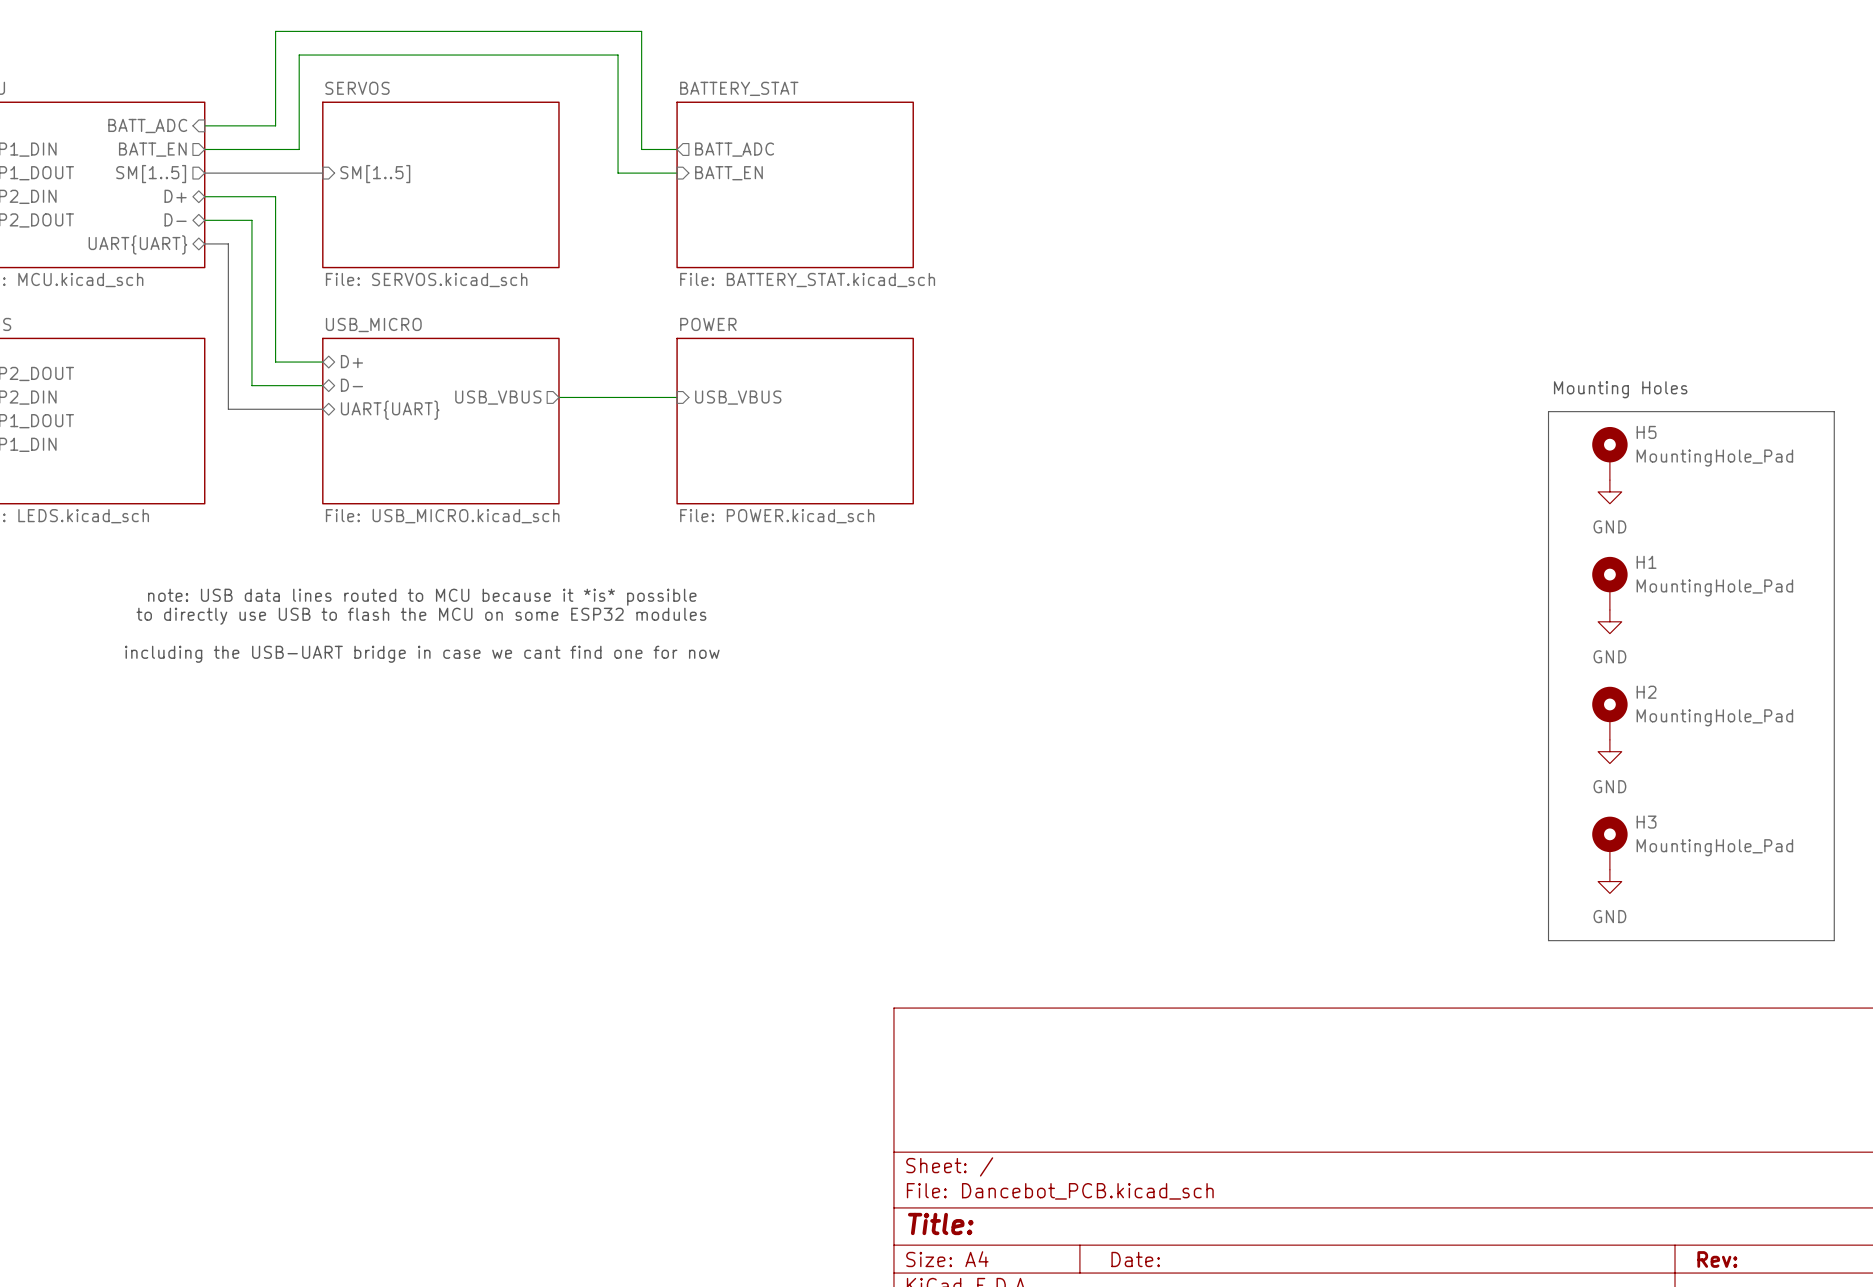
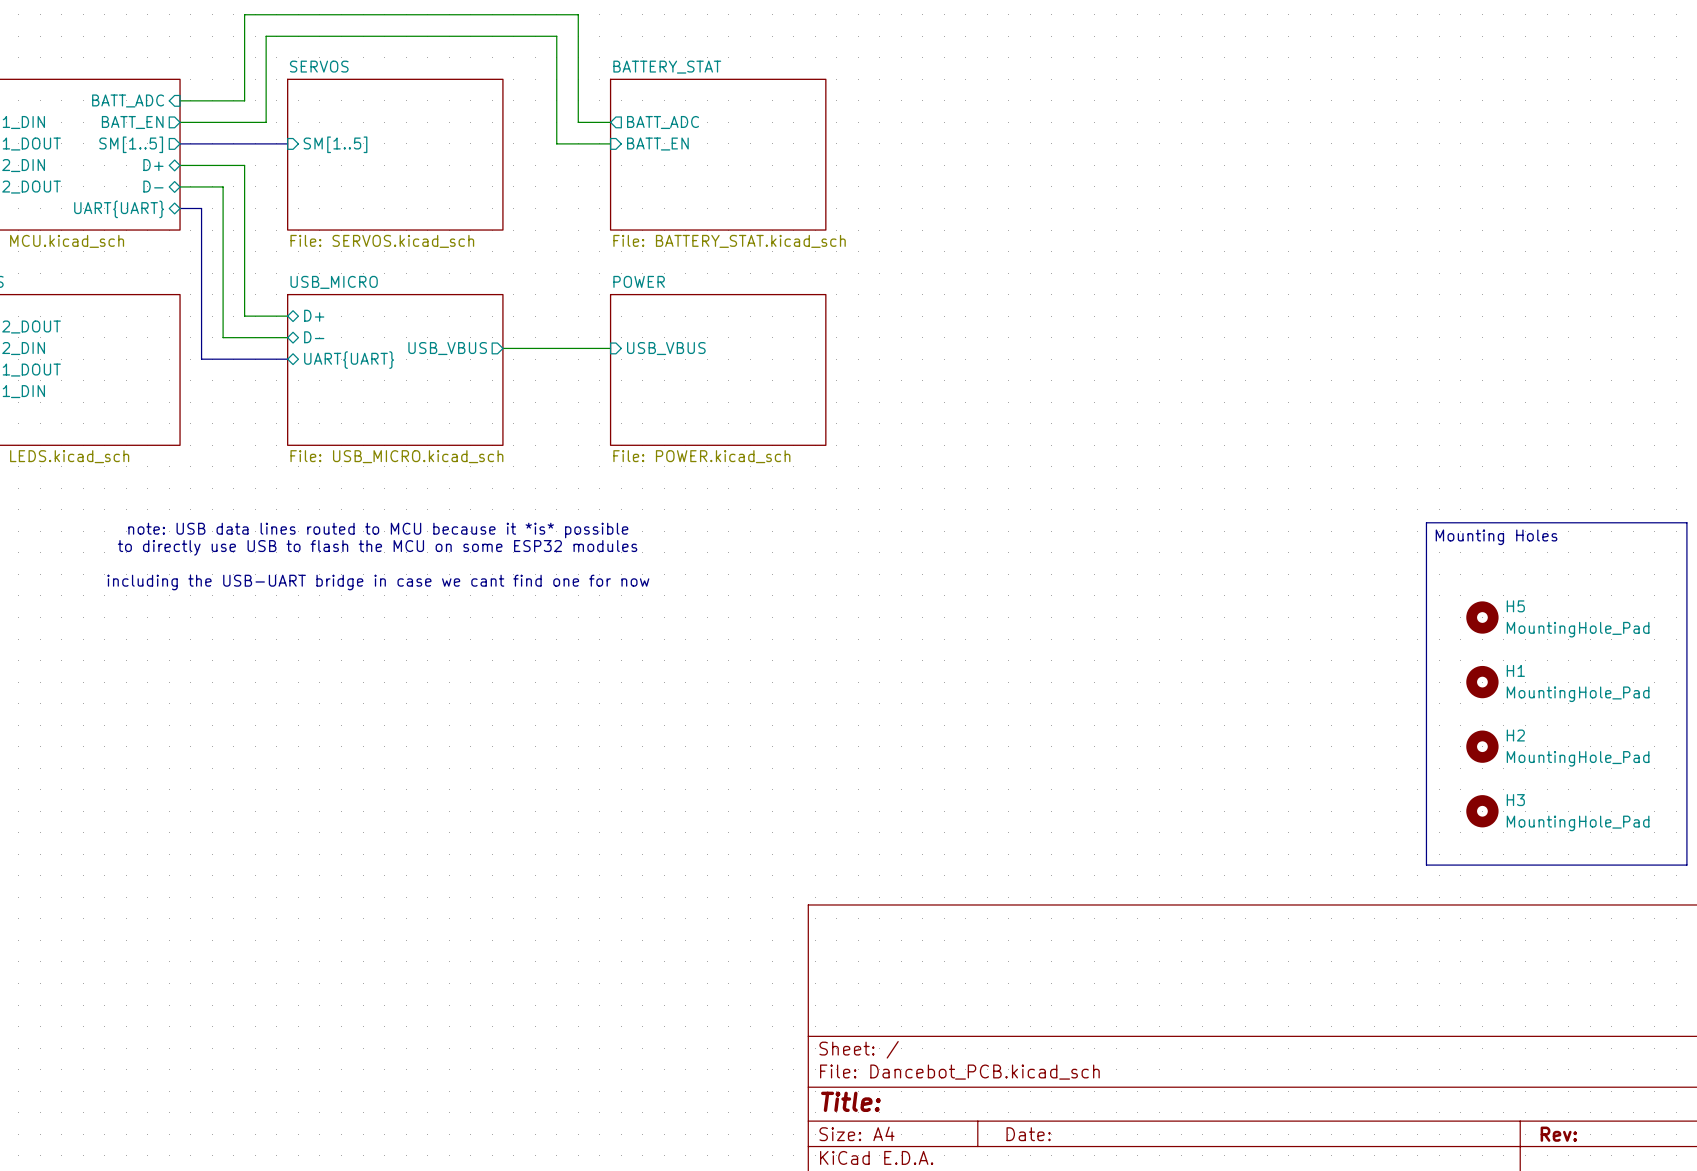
text position: Mounting Holes (1620, 389) -> Mounting Holes (1496, 537)
line: (1548, 411) (1834, 411) (1834, 940) (1548, 940) (1548, 411) -> (1426, 522) (1426, 865) (1686, 865) (1686, 522) (1426, 522)
H5 symbol: [1592, 426, 1628, 481] -> [1466, 601, 1499, 634]
power symbol: GND (1609, 491) -> none
H1 symbol: [1592, 556, 1628, 611] -> [1466, 665, 1499, 699]
power symbol: GND (1609, 621) -> none
H2 symbol: [1592, 686, 1628, 740] -> [1466, 730, 1499, 763]
power symbol: GND (1609, 751) -> none
H3 symbol: [1592, 816, 1628, 870] -> [1466, 795, 1499, 828]
power symbol: GND (1609, 881) -> none

